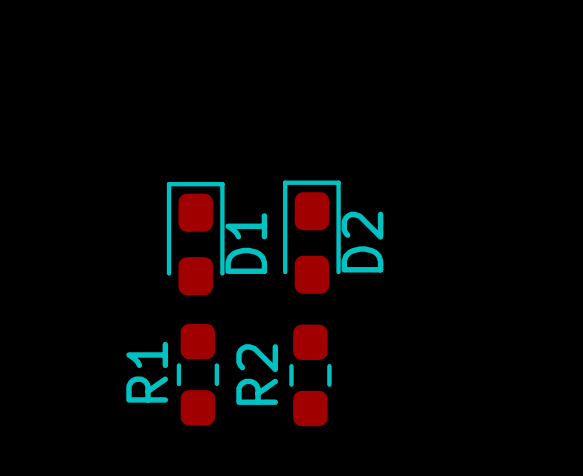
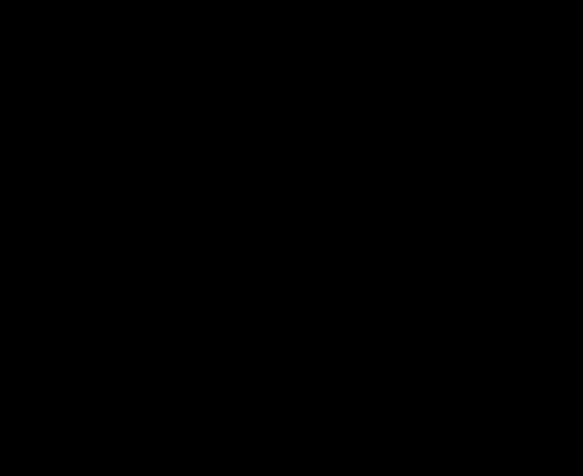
D2: (311, 237) -> none
D1: (195, 238) -> none
R1: (197, 374) -> none
R2: (310, 375) -> none

